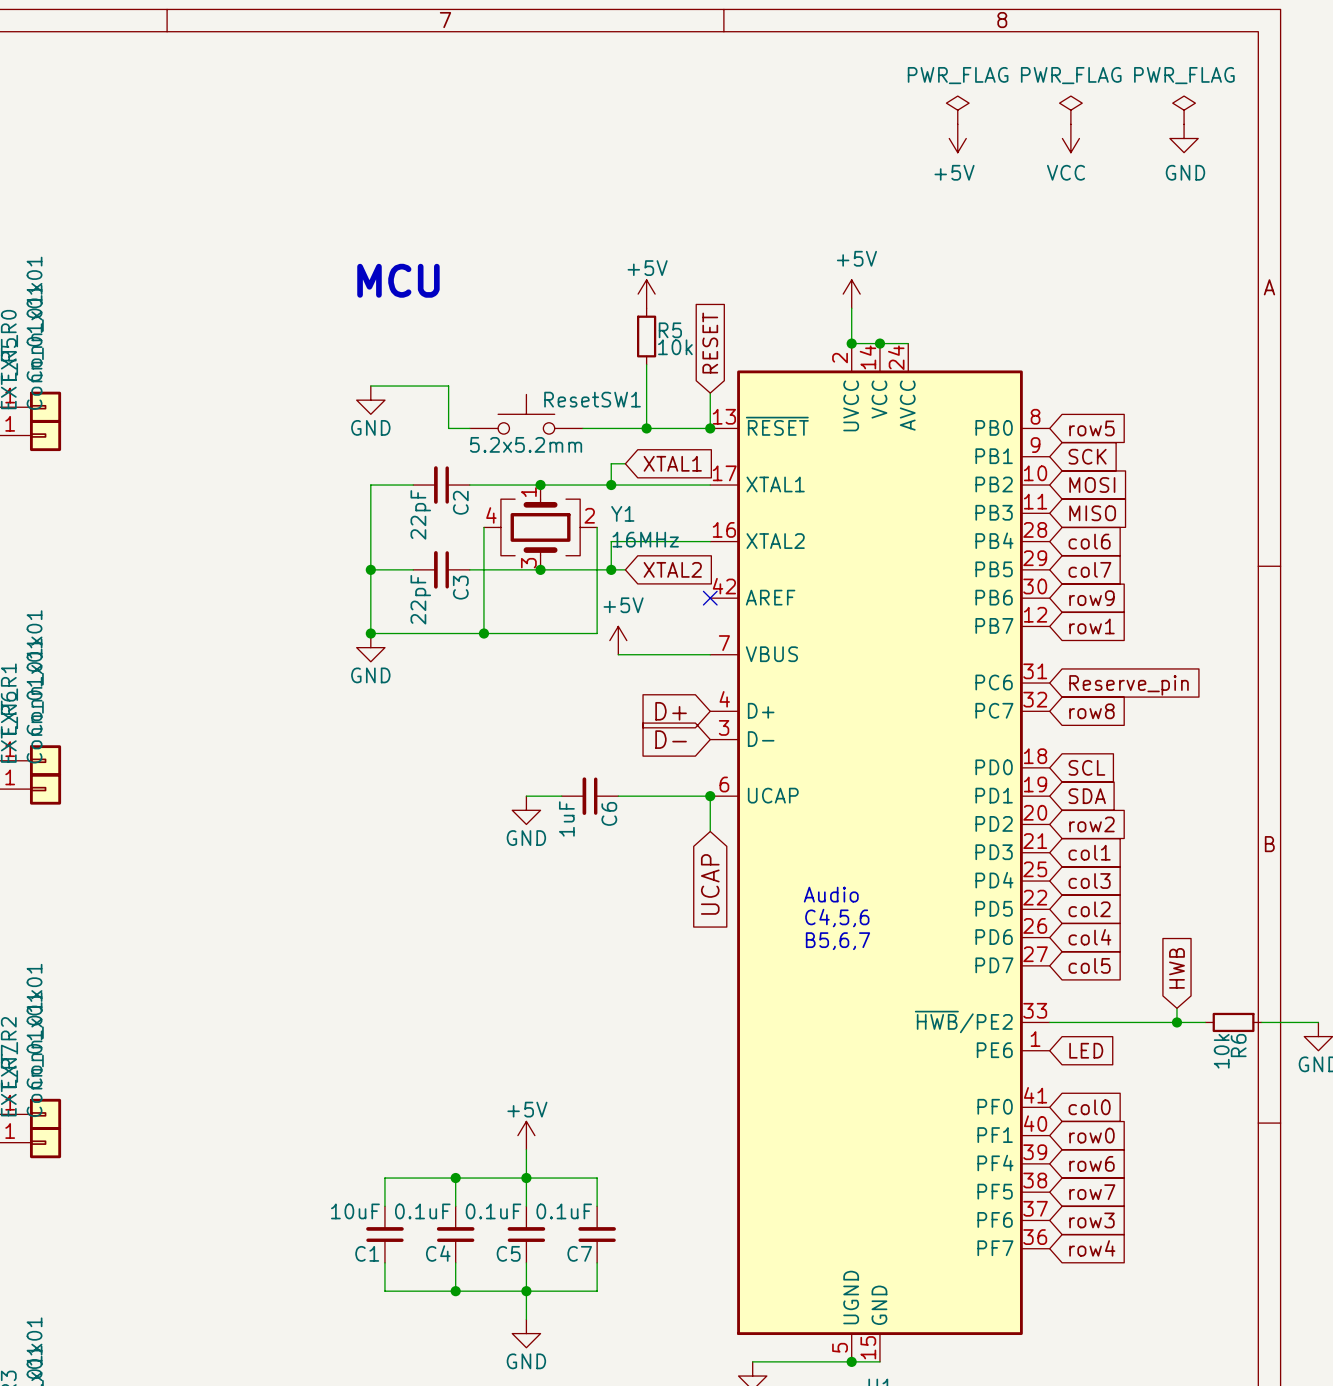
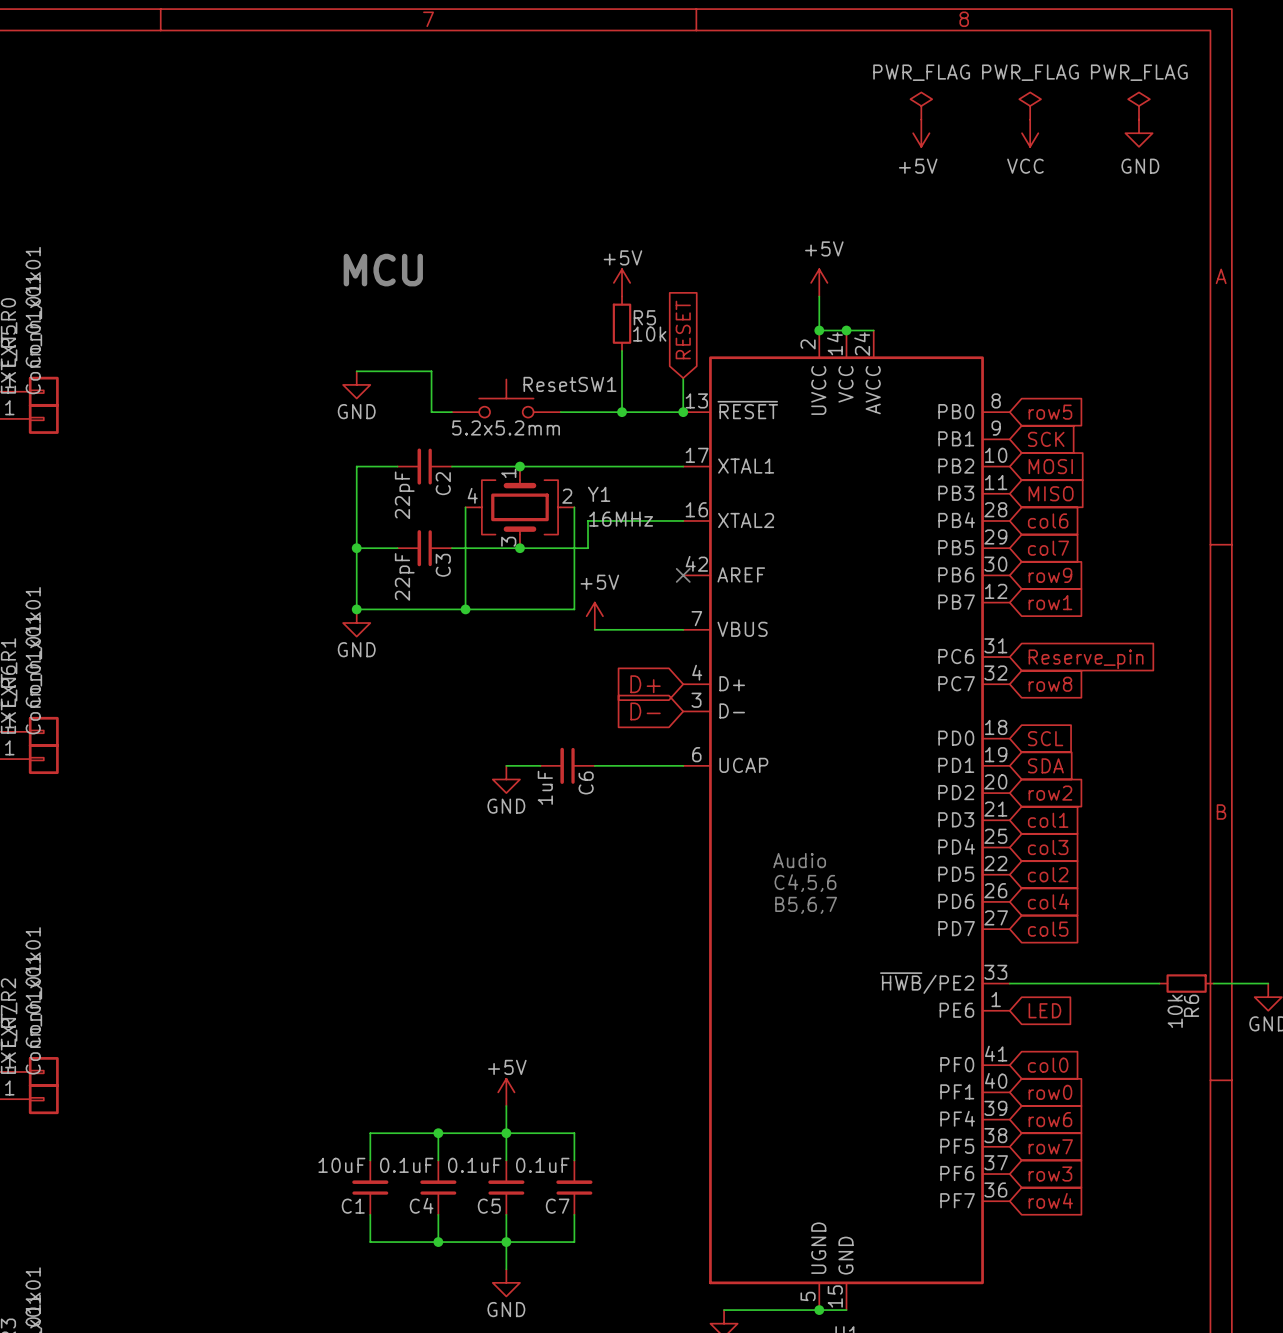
wire: (625, 463) (611, 463) (611, 485) -> none
global label: XTAL1 (672, 463) -> none
junction: (611, 485) -> none
wire: (611, 569) (625, 569) -> none
junction: (611, 569) -> none
global label: XTAL2 (672, 569) -> none
wire: (710, 796) (710, 831) -> none
junction: (710, 796) -> none
global label: UCAP (710, 884) -> none
global label: HWB (1176, 968) -> none
wire: (1176, 1008) (1176, 1022) -> none
junction: (1176, 1022) -> none

